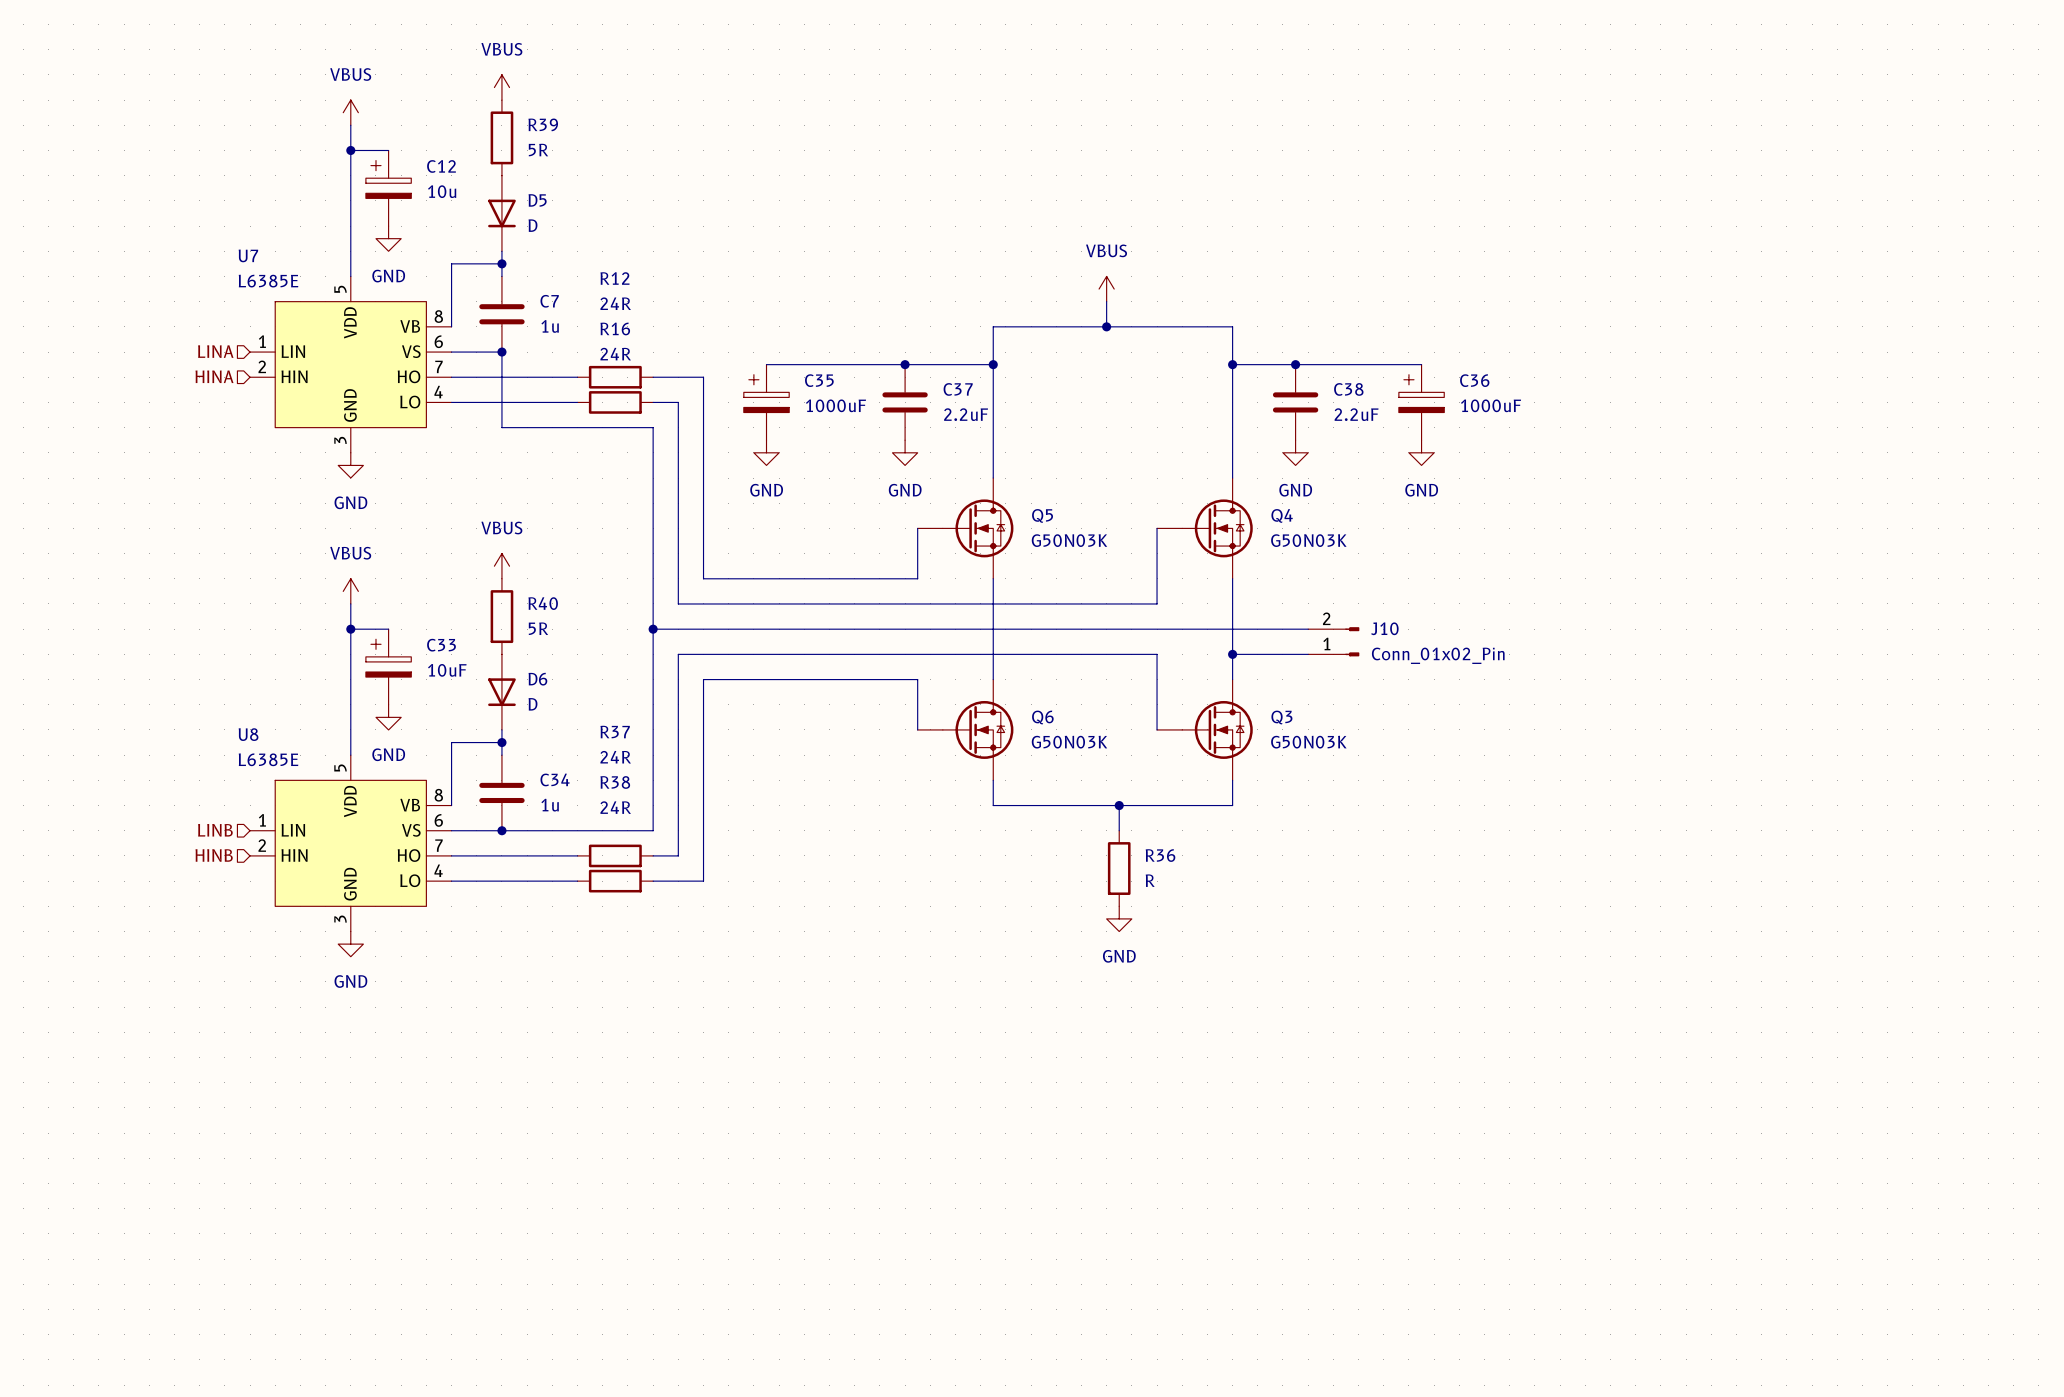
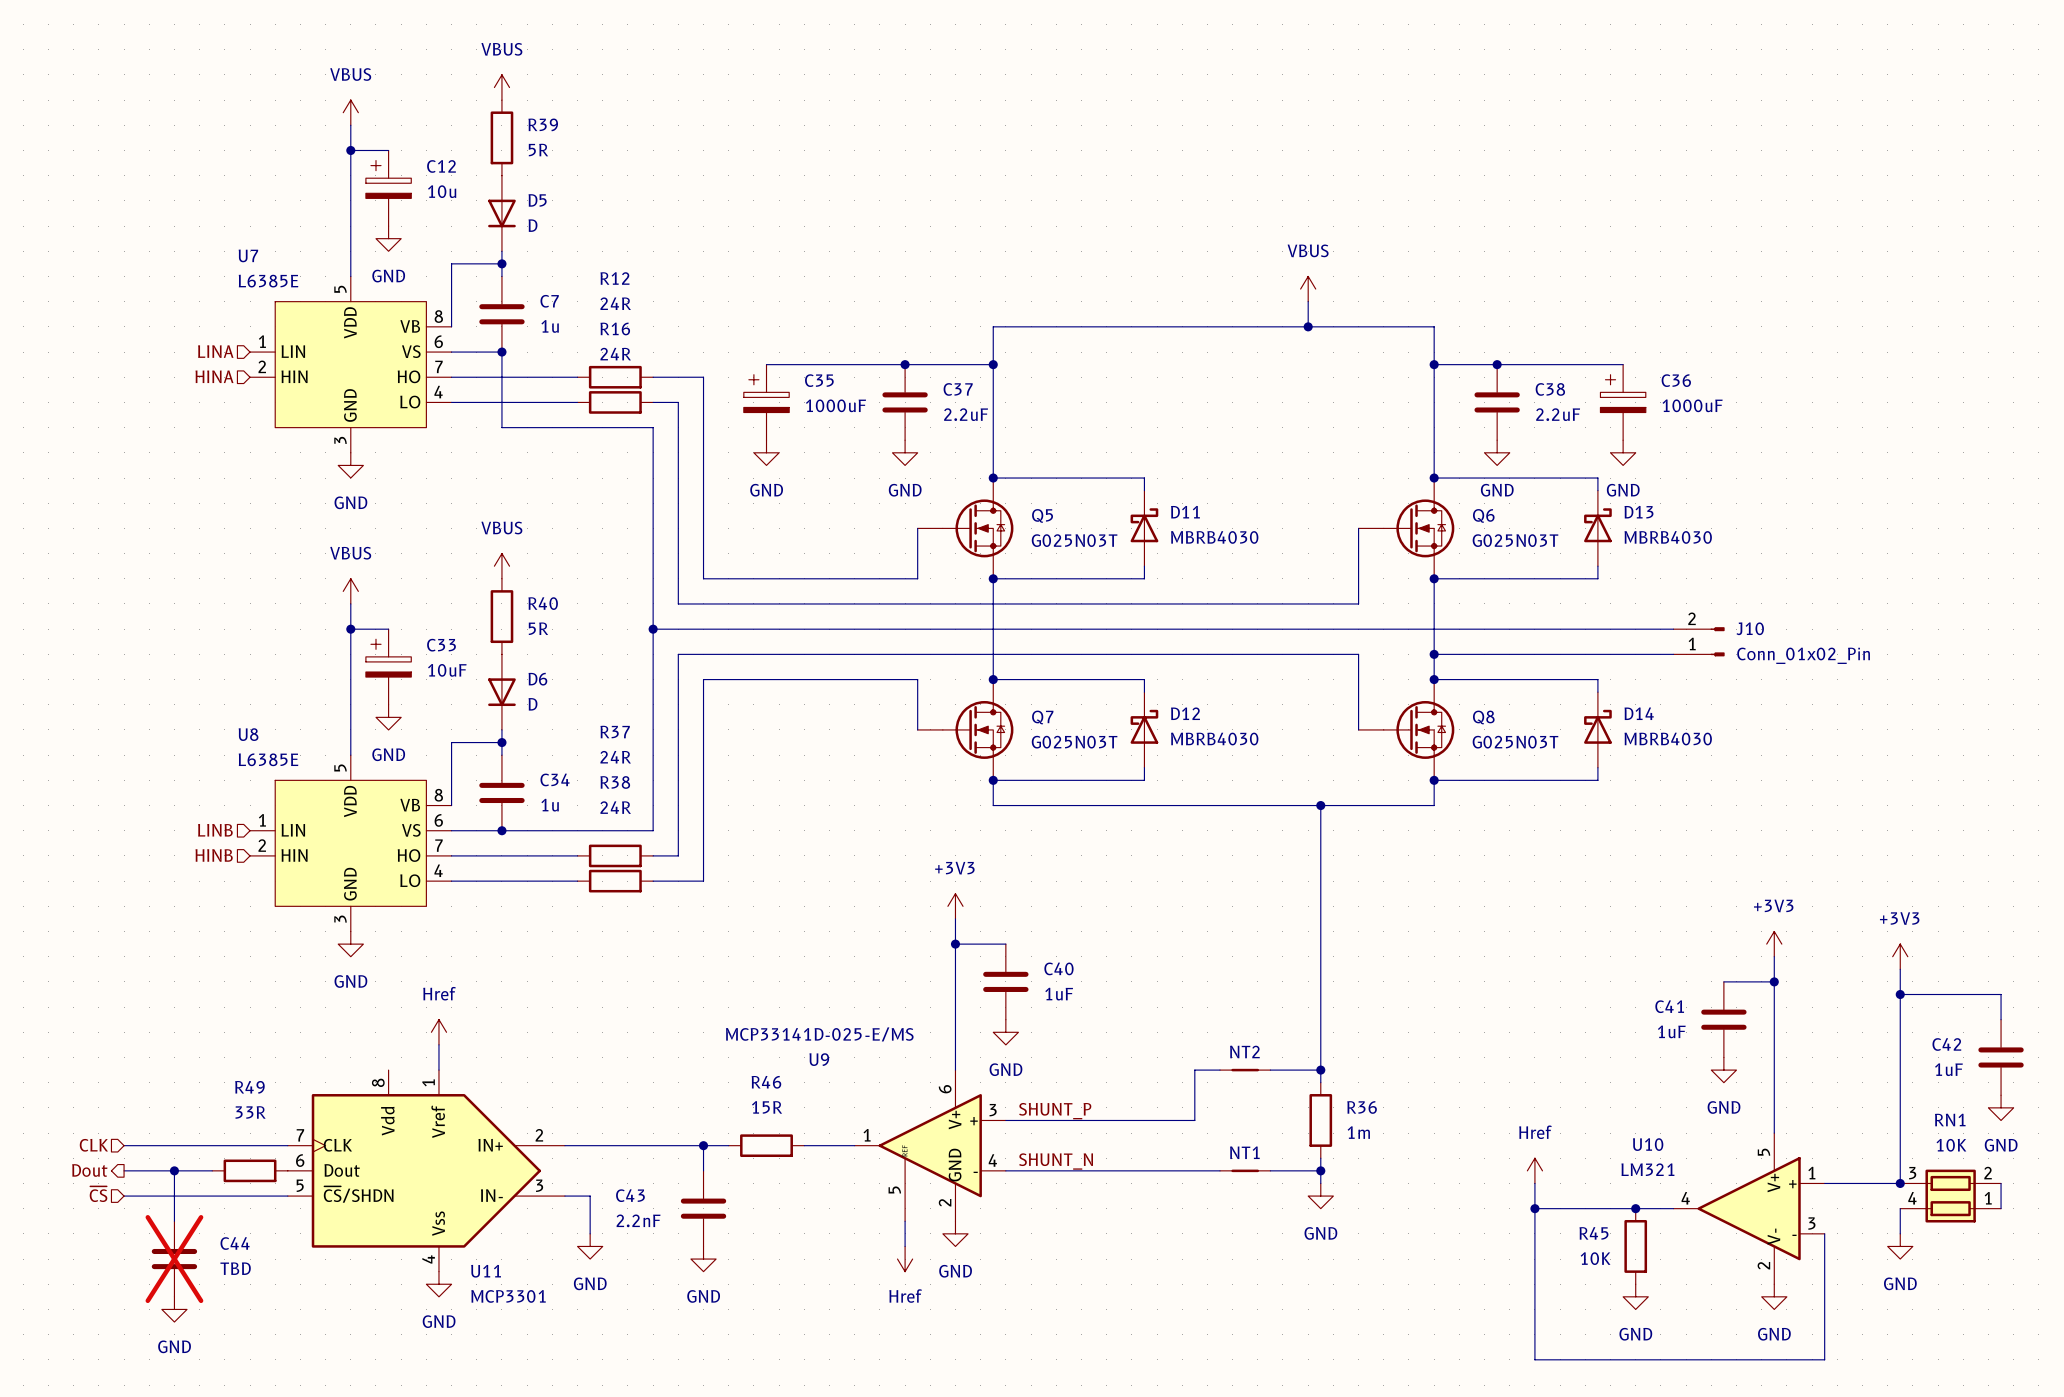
power symbol position: VBUS (1106, 289) -> VBUS (1308, 289)
wire: (1106, 301) (1106, 326) -> (1308, 301) (1308, 326)
junction: (1106, 326) -> none
wire: (1232, 326) (1232, 478) -> (1232, 326) (1434, 326) (1434, 478) (1597, 478) (1597, 490)
wire: (1232, 364) (1421, 364) -> (1434, 364) (1623, 364)
junction: (1232, 364) -> none
junction position: (1295, 364) -> (1308, 326)
junction: none -> (1434, 364)
junction: none -> (1497, 364)
C38 position: (1295, 402) -> (1497, 402)
C36 position: (1421, 402) -> (1623, 402)
power symbol: GND (1295, 452) -> none
power symbol position: GND (1421, 452) -> GND (1497, 452)
power symbol: none -> GND (1623, 452)
wire: none -> (993, 478) (1144, 478) (1144, 490)
junction: none -> (993, 478)
junction: none -> (1434, 478)
D11: none -> MBRB4030 (1144, 528)
wire: (1157, 528) (1157, 603) -> (1358, 528) (1358, 603) (1157, 603)
Q4: G50N03K (1204, 528) -> none
Q6: none -> G025N03T (1406, 528)
D13: none -> MBRB4030 (1597, 528)
Q5 value: G50N03K (1069, 540) -> G025N03T (1074, 540)
wire: none -> (1144, 566) (1144, 578) (993, 578)
wire: none -> (1597, 566) (1597, 578) (1434, 578) (1434, 679) (1597, 679) (1597, 692)
junction: none -> (993, 578)
wire: (1232, 578) (1232, 679) -> none
junction: none -> (1434, 578)
wire: none -> (1308, 629) (1673, 629)
J10 position: (1333, 641) -> (1699, 641)
wire: (1157, 654) (1157, 729) -> (1157, 654) (1232, 654)
junction: (1232, 654) -> none
wire: none -> (1308, 654) (1358, 654) (1358, 729)
wire: none -> (1434, 654) (1673, 654)
junction: none -> (1434, 654)
wire: none -> (993, 679) (1144, 679) (1144, 692)
junction: none -> (993, 679)
junction: none -> (1434, 679)
Q6 name: Q6 (1042, 717) -> Q7 (1042, 717)
D12: none -> MBRB4030 (1144, 729)
Q3: G50N03K (1204, 729) -> none
Q8: none -> G025N03T (1406, 729)
D14: none -> MBRB4030 (1597, 729)
Q6 value: G50N03K (1069, 742) -> G025N03T (1074, 742)
wire: none -> (1144, 767) (1144, 780) (993, 780)
junction: none -> (993, 780)
wire: (1232, 780) (1232, 805) -> (1597, 767) (1597, 780) (1434, 780) (1434, 805) (1232, 805)
junction: none -> (1434, 780)
wire: (1119, 805) (1119, 830) -> none
junction: (1119, 805) -> none
wire: none -> (1320, 805) (1320, 1082)
junction: none -> (1320, 805)
R36 position: (1119, 868) -> (1320, 1120)
R36 value: R (1150, 880) -> 1m (1358, 1132)
power symbol: none -> +3V3 (955, 906)
wire: none -> (955, 918) (955, 1070)
power symbol position: GND (1119, 918) -> GND (1005, 1032)
wire: none -> (955, 944) (1005, 944)
junction: none -> (955, 944)
power symbol: none -> +3V3 (1774, 944)
wire: none -> (1774, 956) (1774, 1133)
power symbol: none -> +3V3 (1900, 956)
wire: none -> (1900, 969) (1900, 1183) (1824, 1183)
C40: none -> 1uF (1005, 981)
wire: none -> (1723, 981) (1774, 981)
junction: none -> (1774, 981)
wire: none -> (1900, 994) (2001, 994) (2001, 1019)
junction: none -> (1900, 994)
C41: none -> 1uF (1723, 1019)
power symbol: none -> Href (438, 1032)
wire: none -> (438, 1044) (438, 1070)
C42: none -> 1uF (2001, 1057)
wire: none -> (1220, 1070) (1194, 1070) (1194, 1120) (1005, 1120)
NT2: none -> (1245, 1070)
wire: none -> (1270, 1070) (1320, 1070)
junction: none -> (1320, 1070)
power symbol: none -> GND (1723, 1070)
power symbol: none -> GND (2001, 1107)
label: none -> SHUNT_P (1055, 1111)
hierarchical label: none -> CLK (93, 1145)
wire: none -> (124, 1145) (287, 1145)
wire: none -> (564, 1145) (728, 1145)
wire: none -> (703, 1145) (703, 1170)
junction: none -> (703, 1145)
R46: none -> 15R (766, 1145)
wire: none -> (804, 1145) (854, 1145)
U9: none -> MCP33141D-025-E/MS (930, 1145)
wire: none -> (1320, 1158) (1320, 1183)
label: none -> SHUNT_N (1056, 1161)
hierarchical label: none -> Dout (89, 1170)
wire: none -> (124, 1170) (212, 1170)
wire: none -> (174, 1170) (174, 1221)
junction: none -> (174, 1170)
R49: none -> 33R (250, 1170)
U11: none -> MCP3301 (426, 1170)
wire: none -> (1005, 1170) (1220, 1170)
NT1: none -> (1245, 1170)
wire: none -> (1270, 1170) (1320, 1170)
junction: none -> (1320, 1170)
power symbol: none -> Href (1534, 1170)
wire: none -> (1534, 1183) (1534, 1359) (1824, 1359) (1824, 1233)
junction: none -> (1900, 1183)
wire: none -> (2001, 1183) (2001, 1208)
hierarchical label: none -> ~{CS} (98, 1194)
wire: none -> (124, 1196) (287, 1196)
wire: none -> (564, 1196) (590, 1196) (590, 1233)
power symbol: none -> GND (1320, 1196)
RN1: none -> 10K (1950, 1196)
C43: none -> 2.2nF (703, 1208)
wire: none -> (1534, 1208) (1673, 1208)
junction: none -> (1534, 1208)
junction: none -> (1635, 1208)
U10: none -> LM321 (1749, 1208)
wire: none -> (1900, 1208) (1900, 1233)
wire: none -> (905, 1221) (905, 1246)
power symbol: none -> GND (955, 1233)
power symbol: none -> GND (590, 1246)
R45: none -> 10K (1635, 1246)
power symbol: none -> GND (1900, 1246)
C44: none -> TBD (174, 1259)
power symbol: none -> GND (703, 1259)
power symbol: none -> Href (905, 1259)
power symbol: none -> GND (438, 1284)
power symbol: none -> GND (1635, 1296)
power symbol: none -> GND (1774, 1296)
power symbol: none -> GND (174, 1309)

